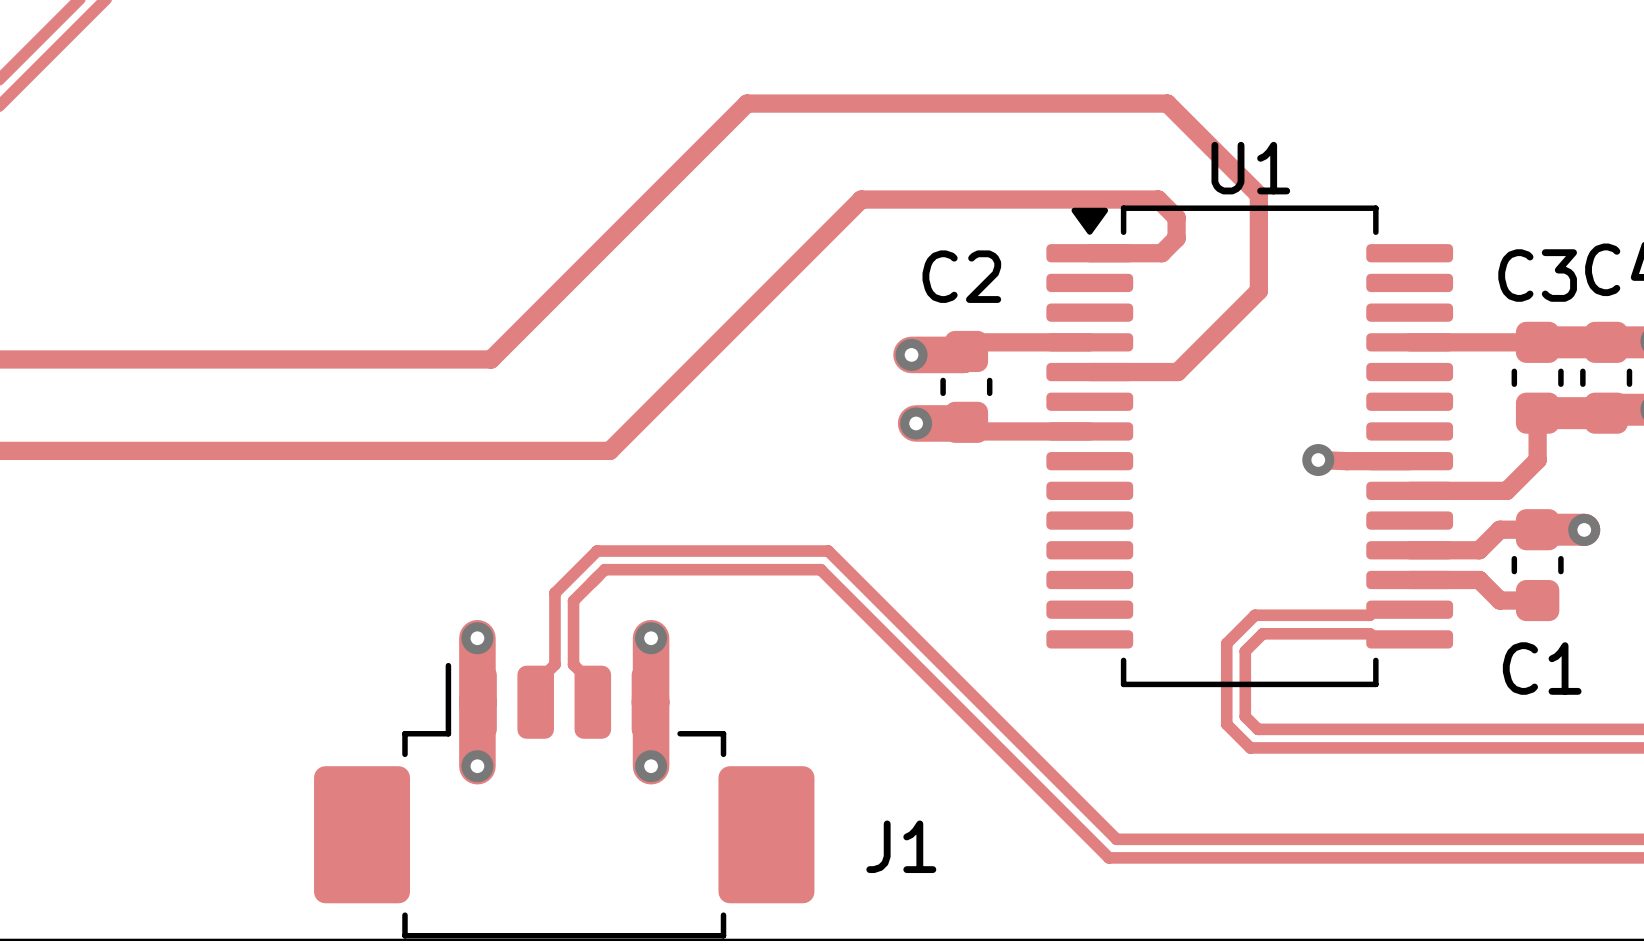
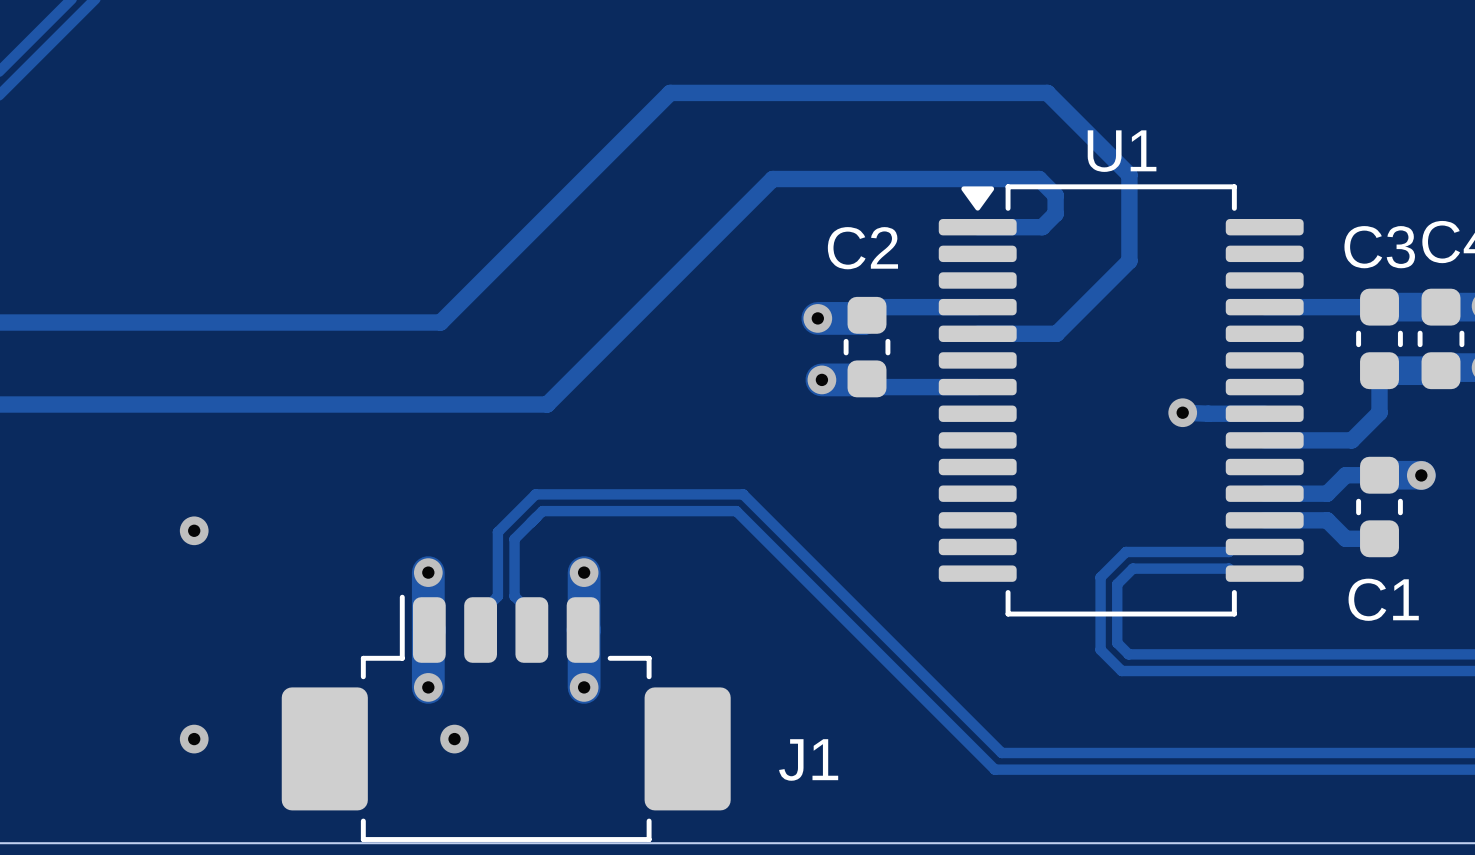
via: none -> (194, 530)
via: none -> (194, 739)
via: none -> (454, 739)

